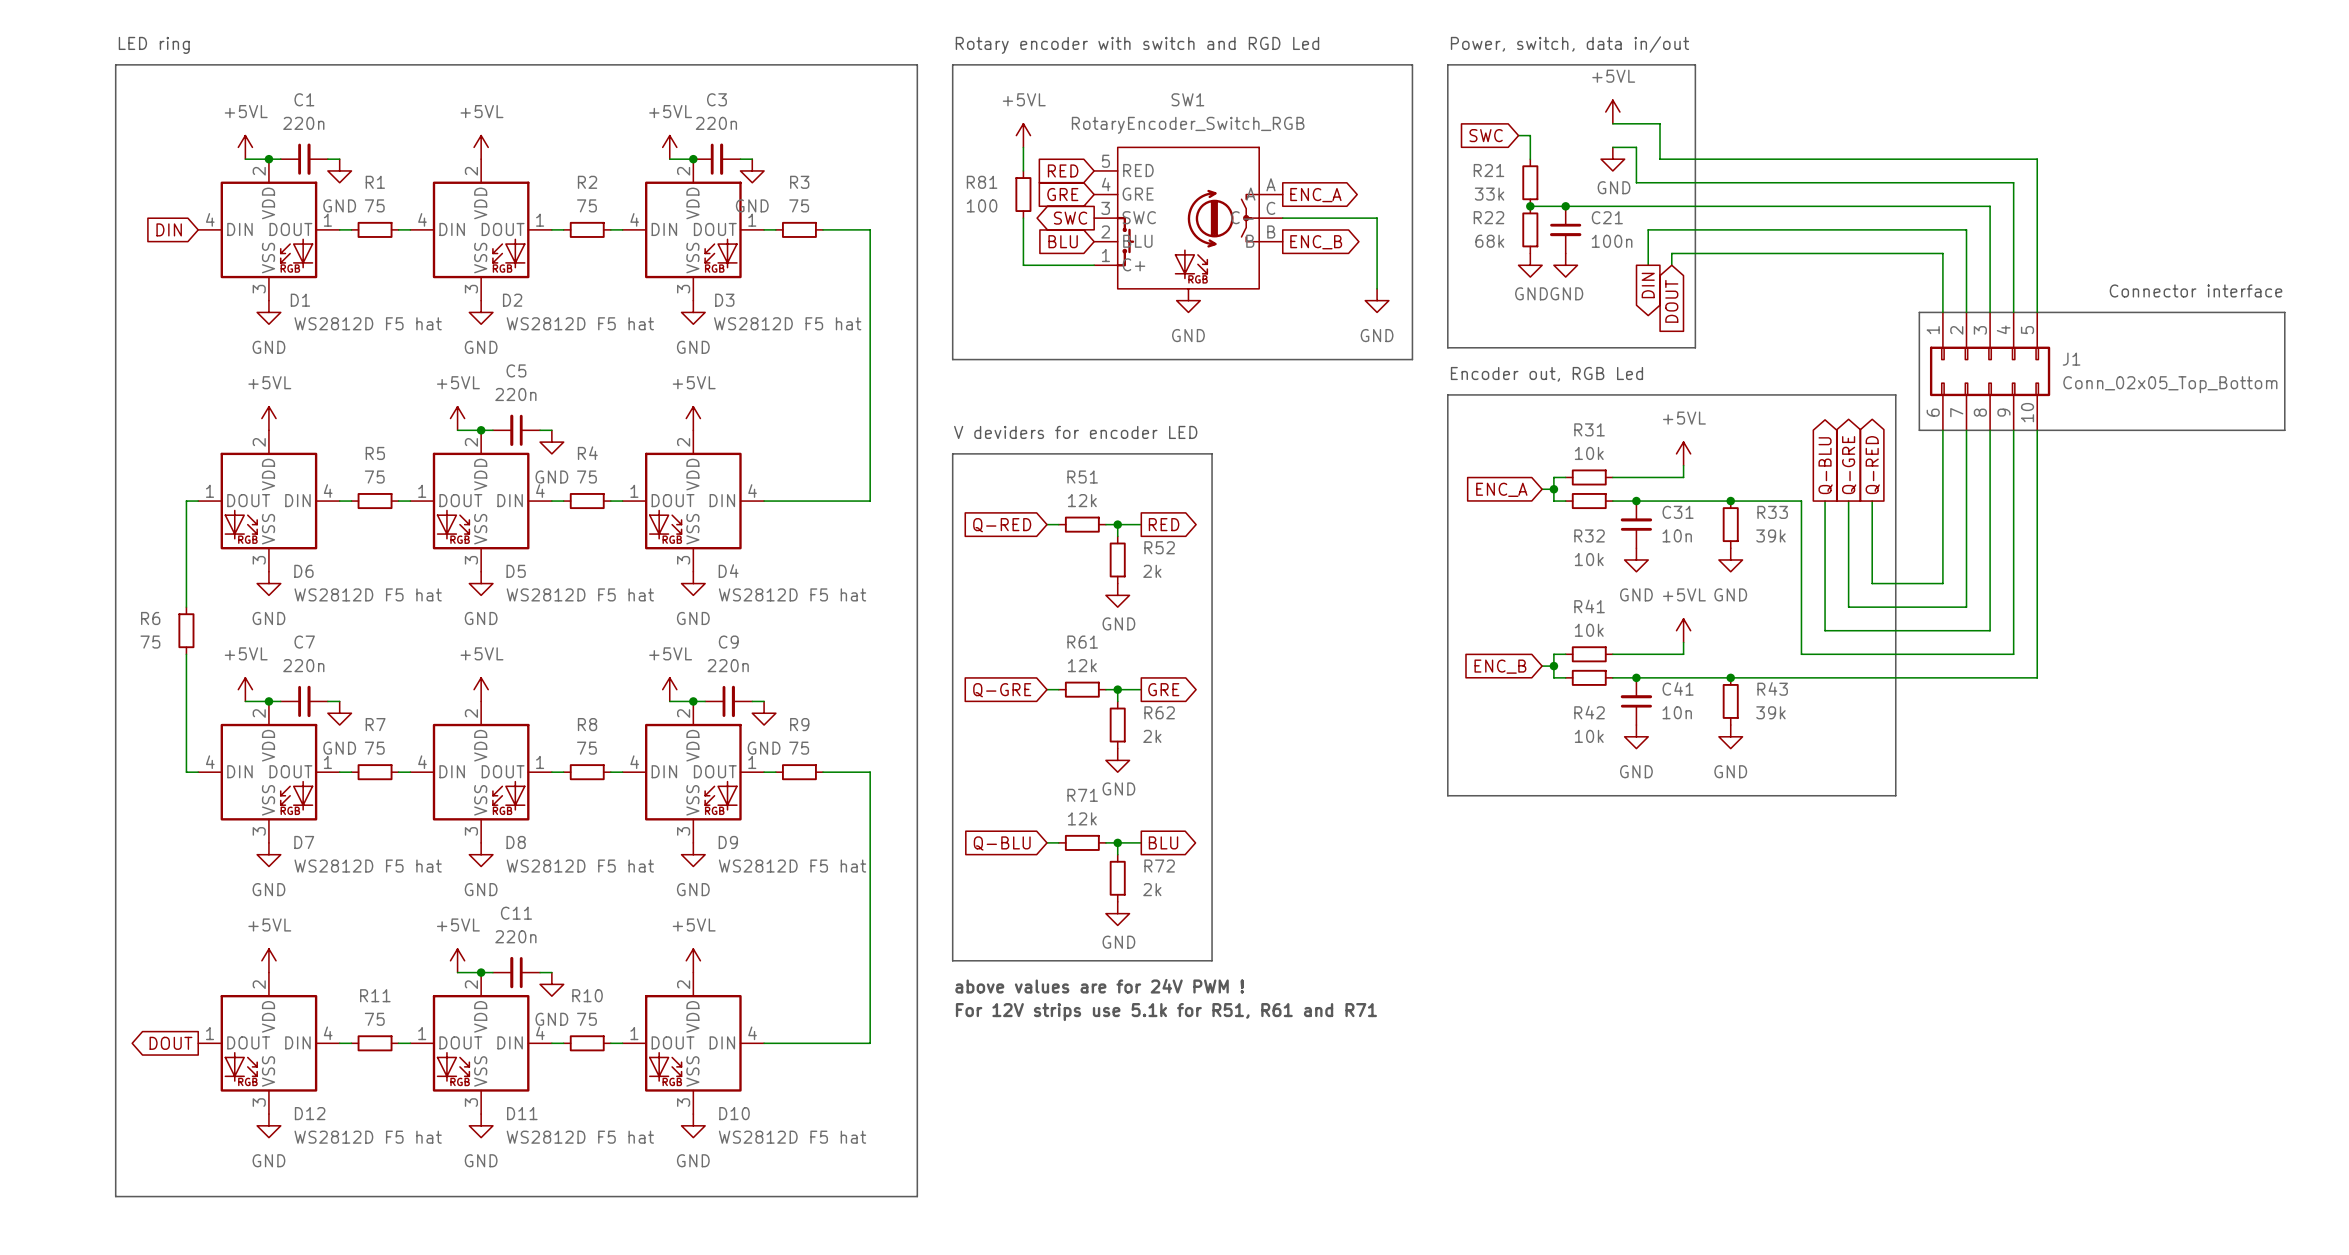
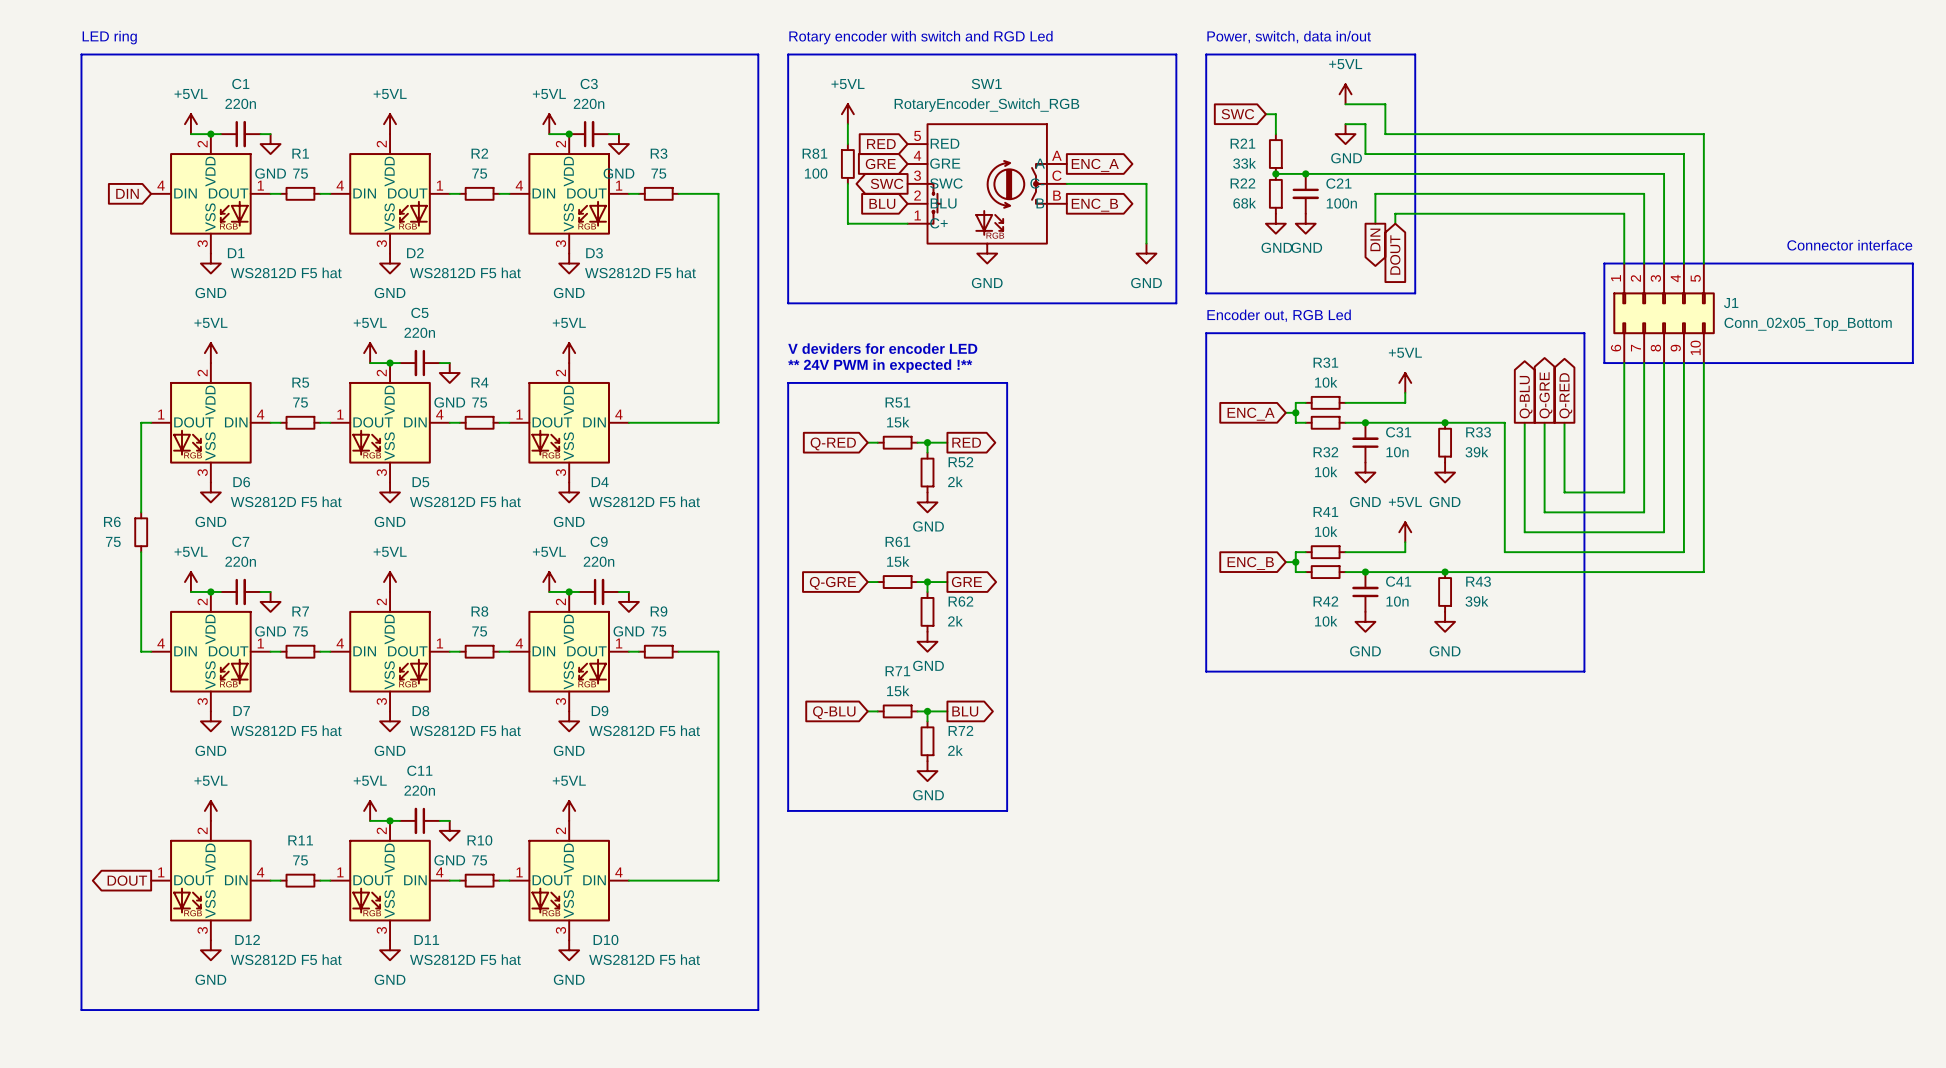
text: none -> V deviders for encoder LED (882, 348)
text: V deviders for encoder LED (1075, 432) -> ** 24V PWM in expected !** (880, 366)
R51 value: 12k (1082, 500) -> 15k (898, 422)
R61 value: 12k (1082, 665) -> 15k (898, 561)
R71 value: 12k (1082, 818) -> 15k (898, 690)
text: above values are for 24V PWM ! (1099, 986) -> none
text: For 12V strips use 5.1k for R51, R61 and R71 (1166, 1012) -> none

